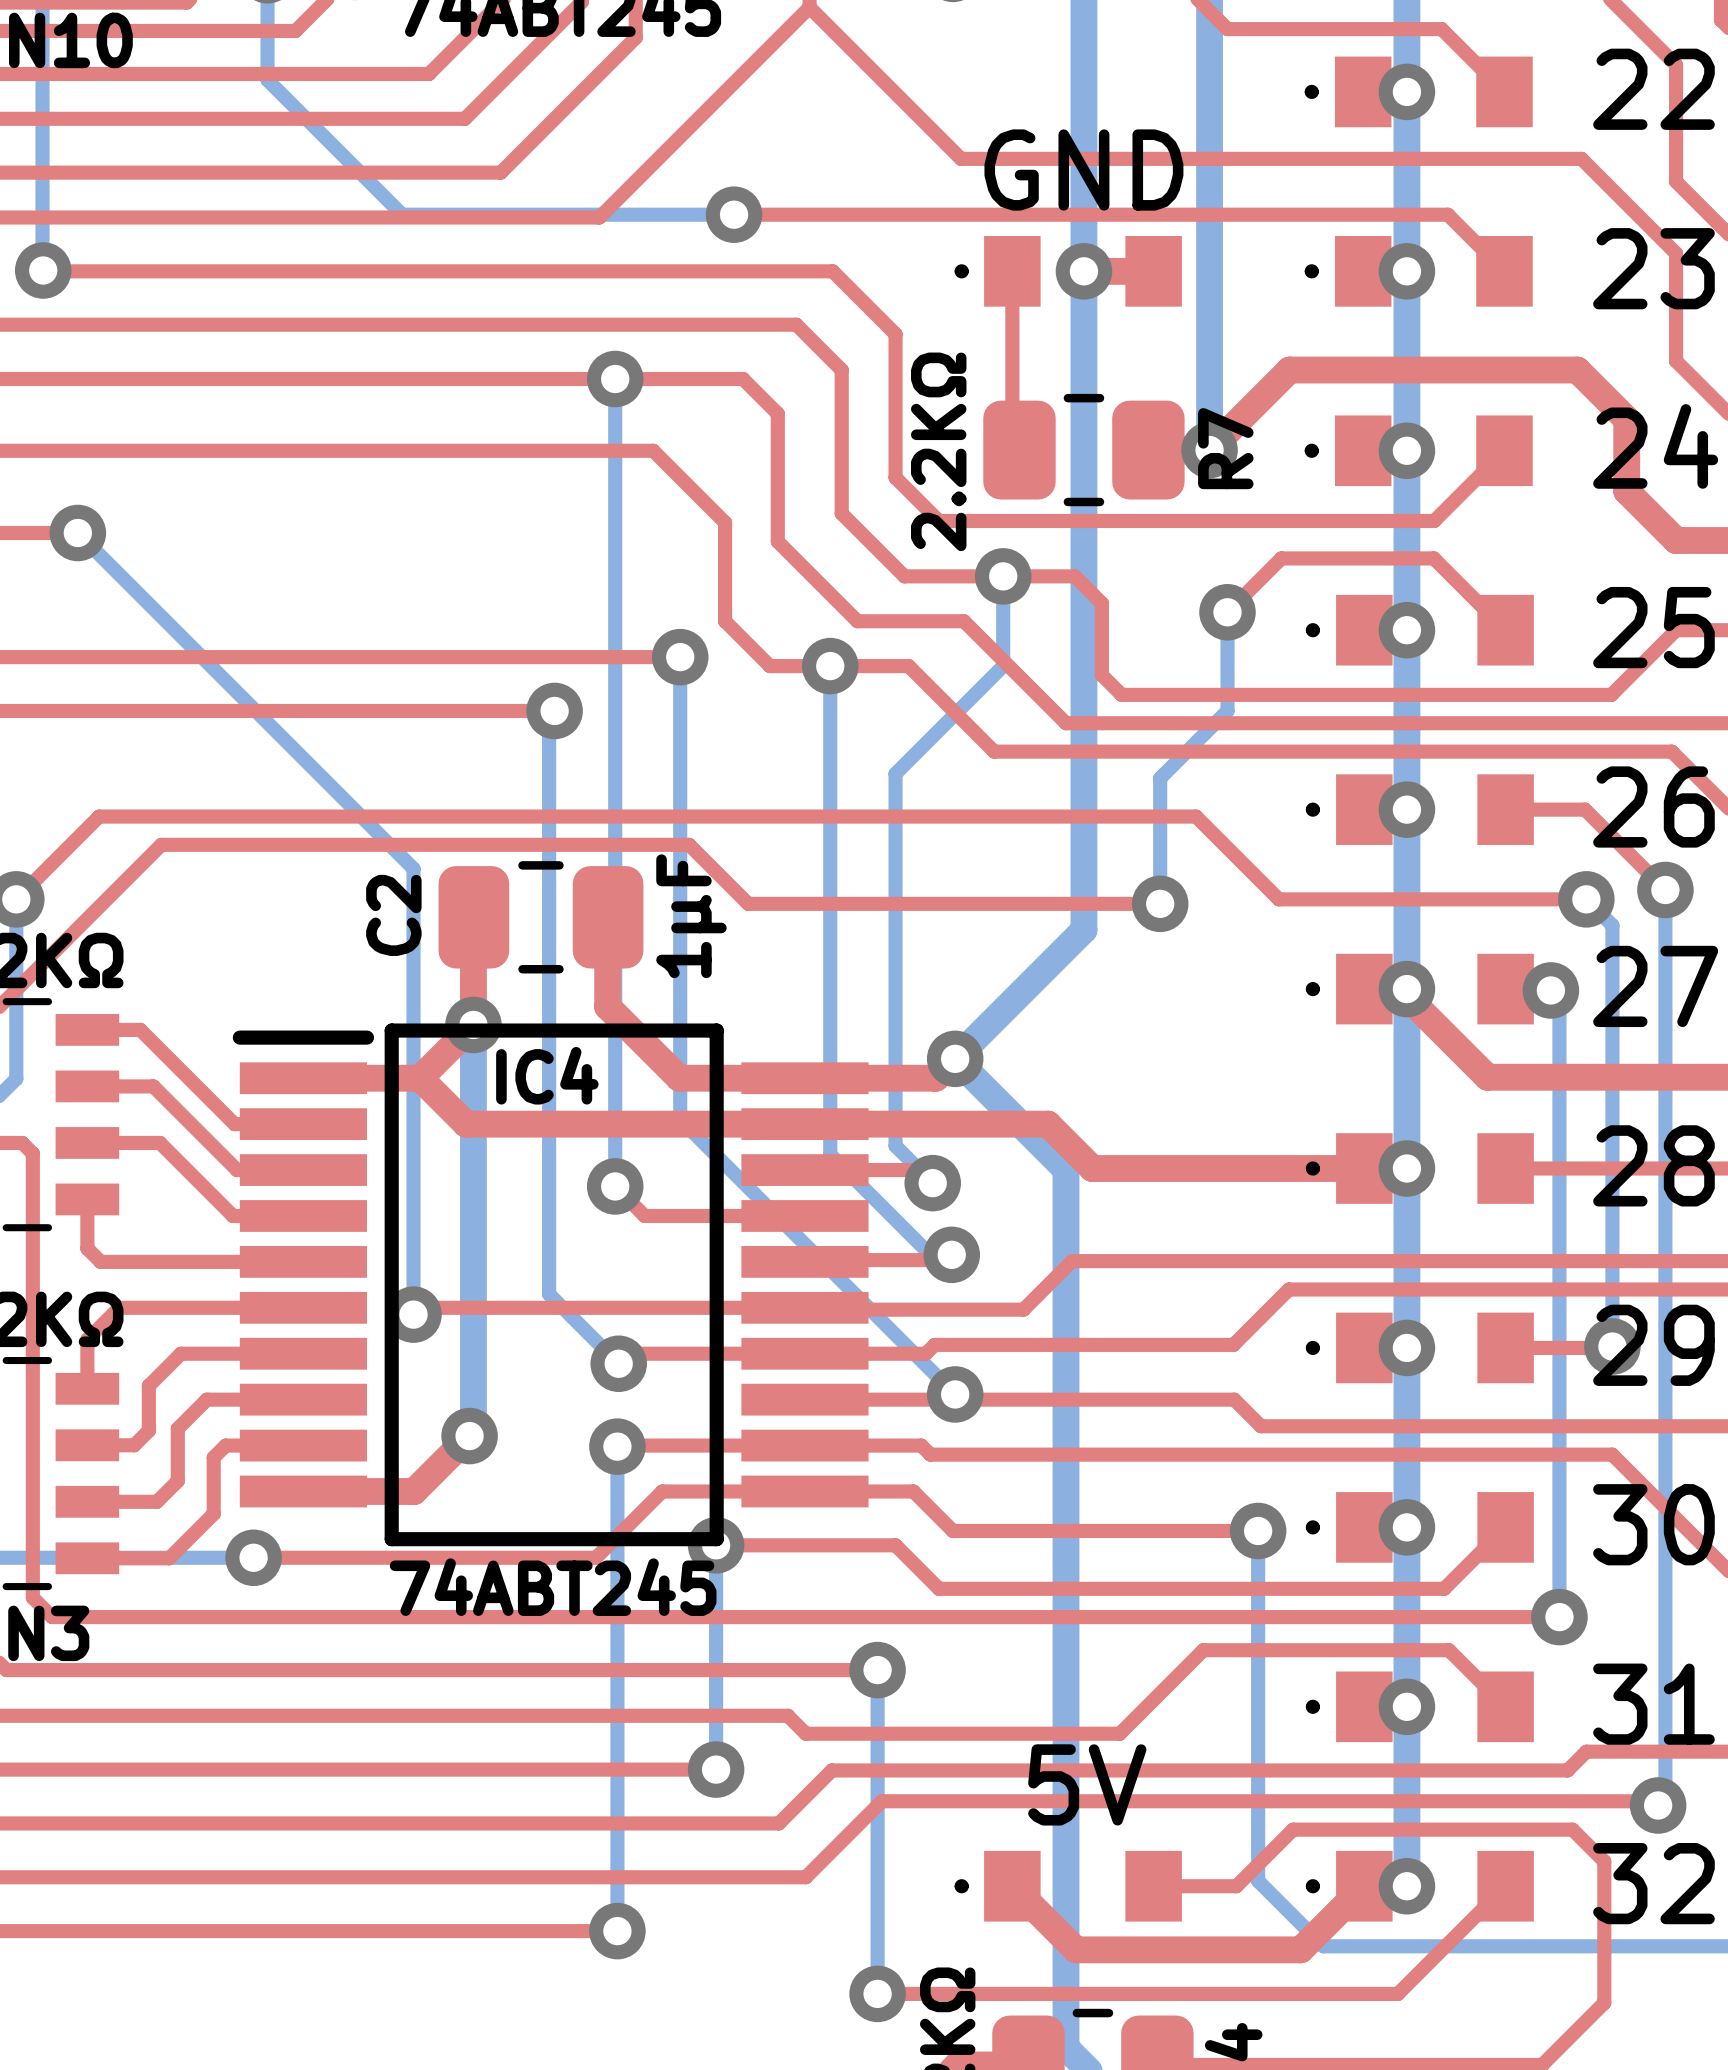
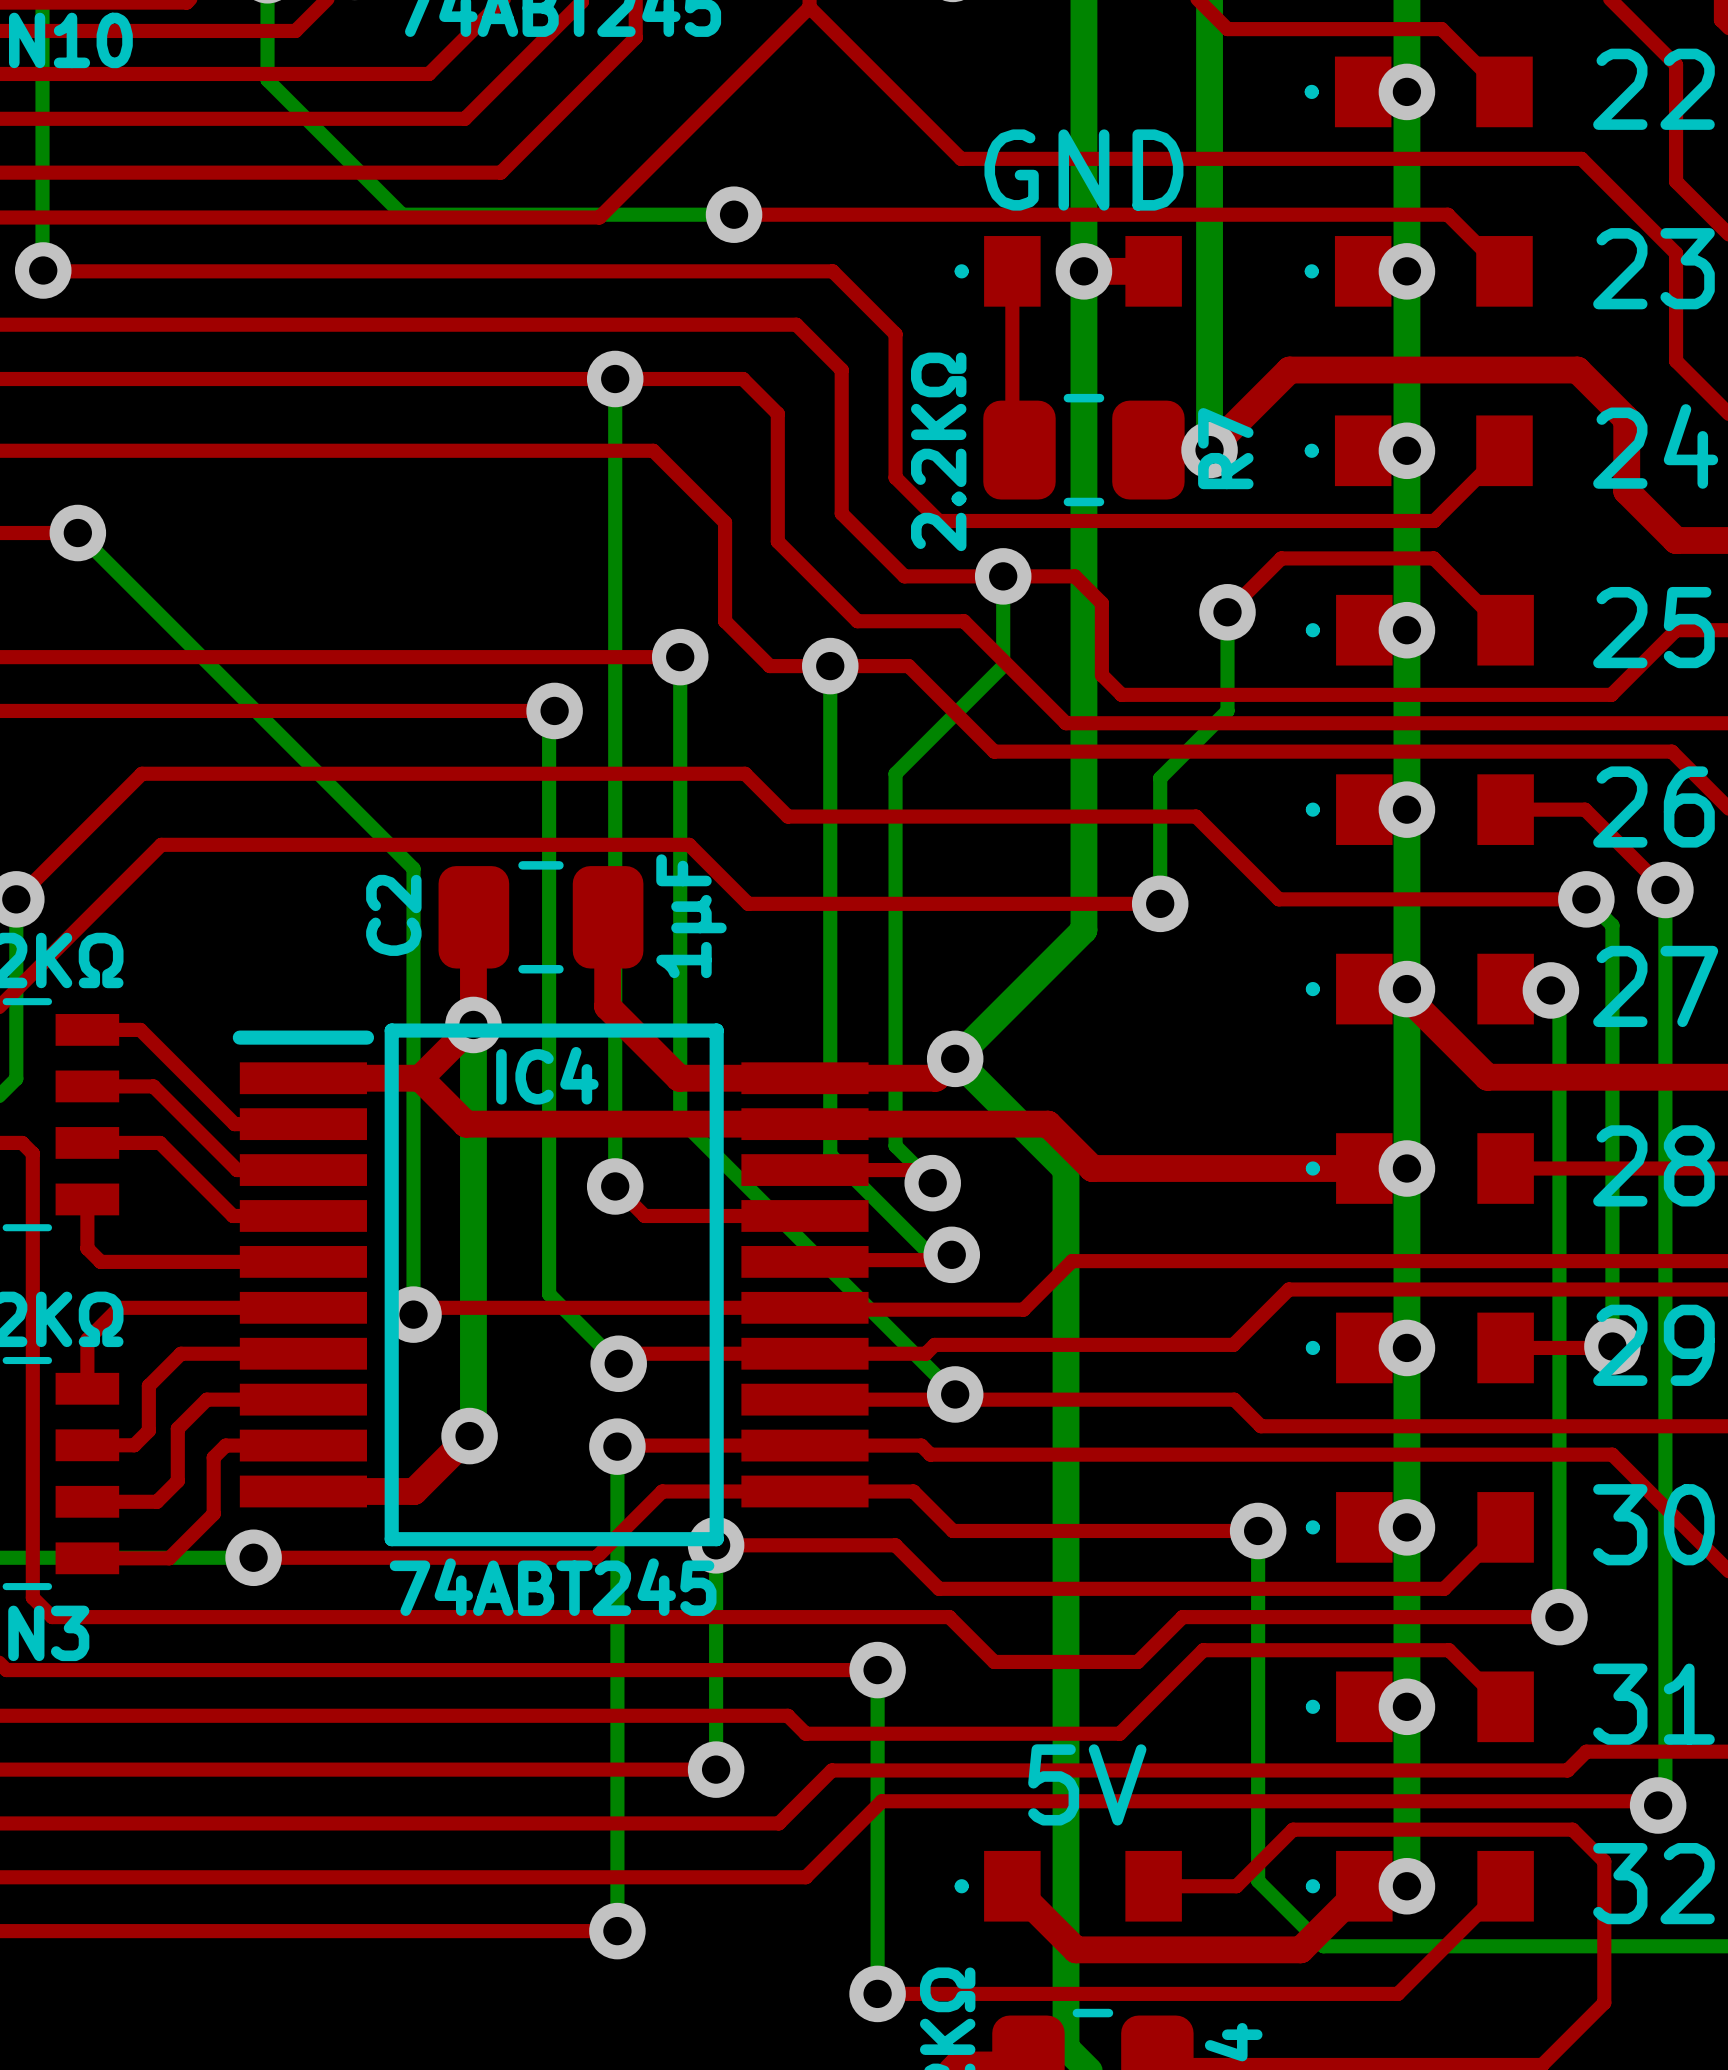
top track: (99, 816) (787, 816) -> (99, 816) (141, 773) (745, 773) (787, 816)
top track: (949, 1617) (1182, 1617) -> (949, 1617) (994, 1661) (1137, 1661) (1182, 1617)

